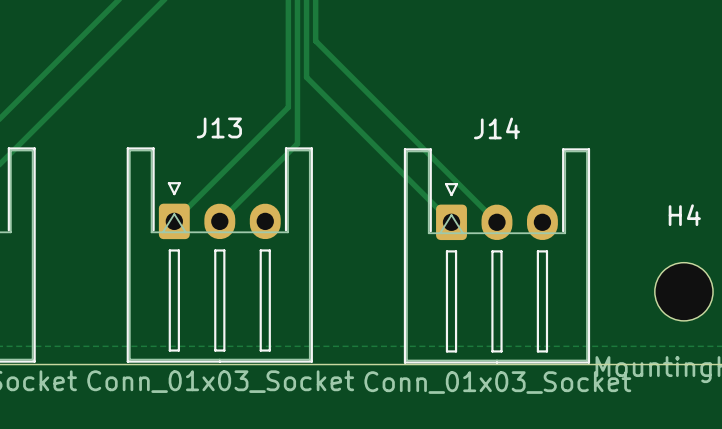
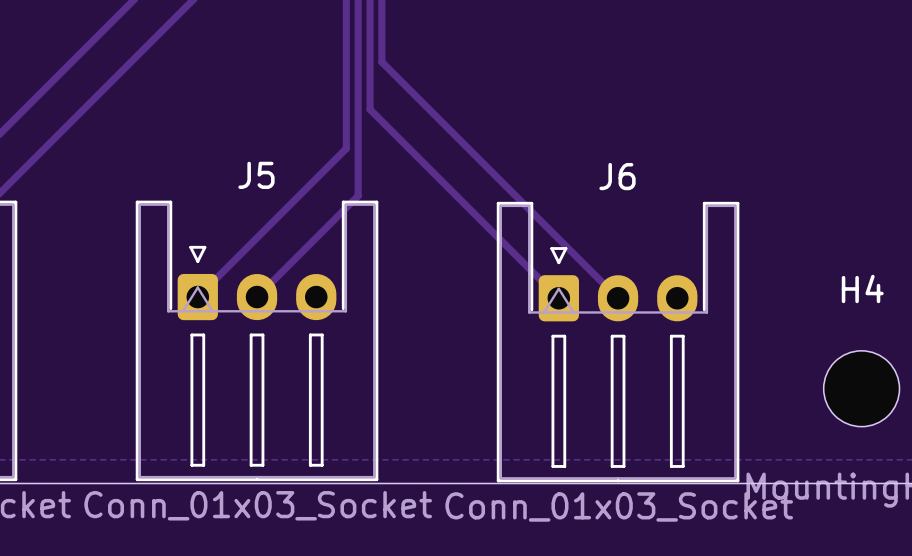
J13 name: J13 (219, 127) -> J5 (256, 175)
J14 name: J14 (496, 128) -> J6 (617, 176)

